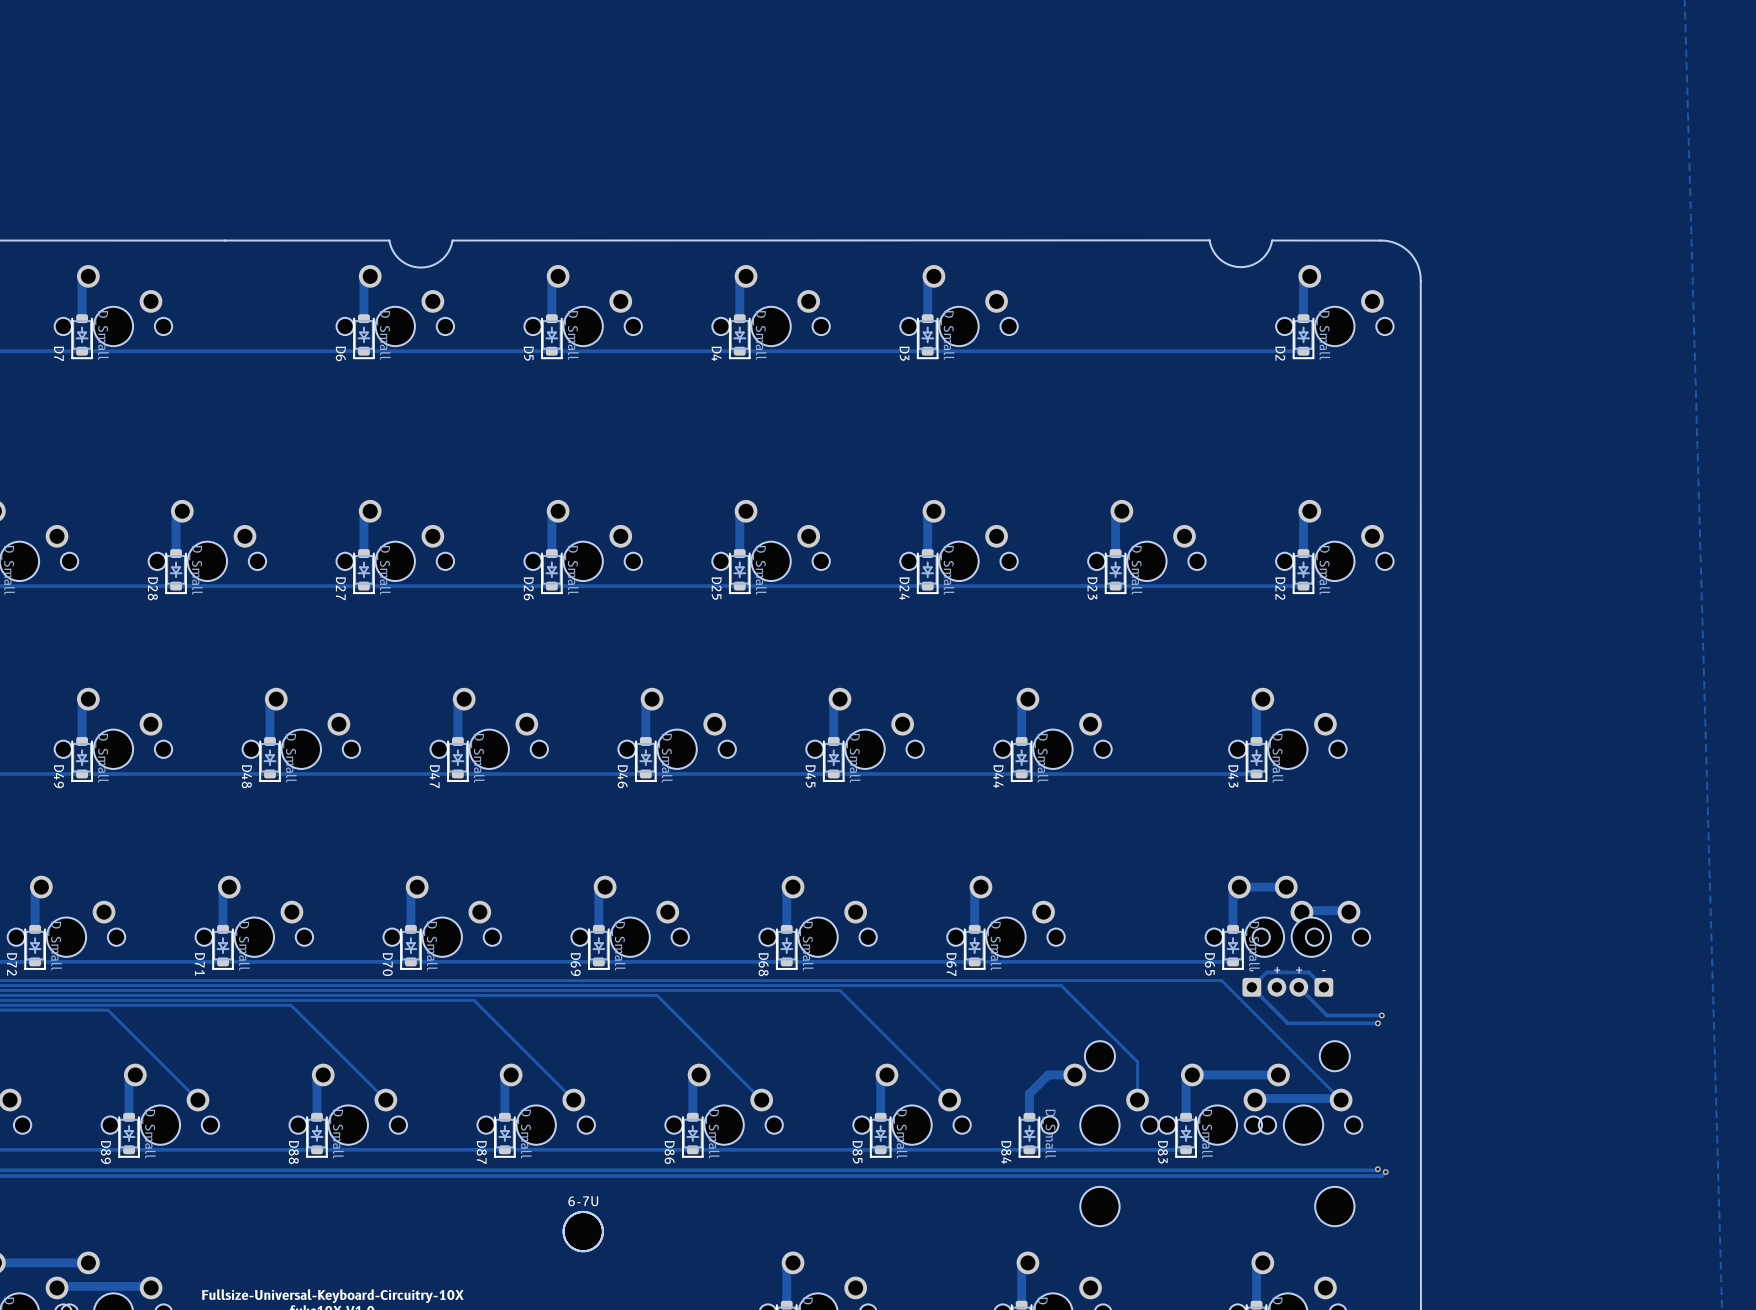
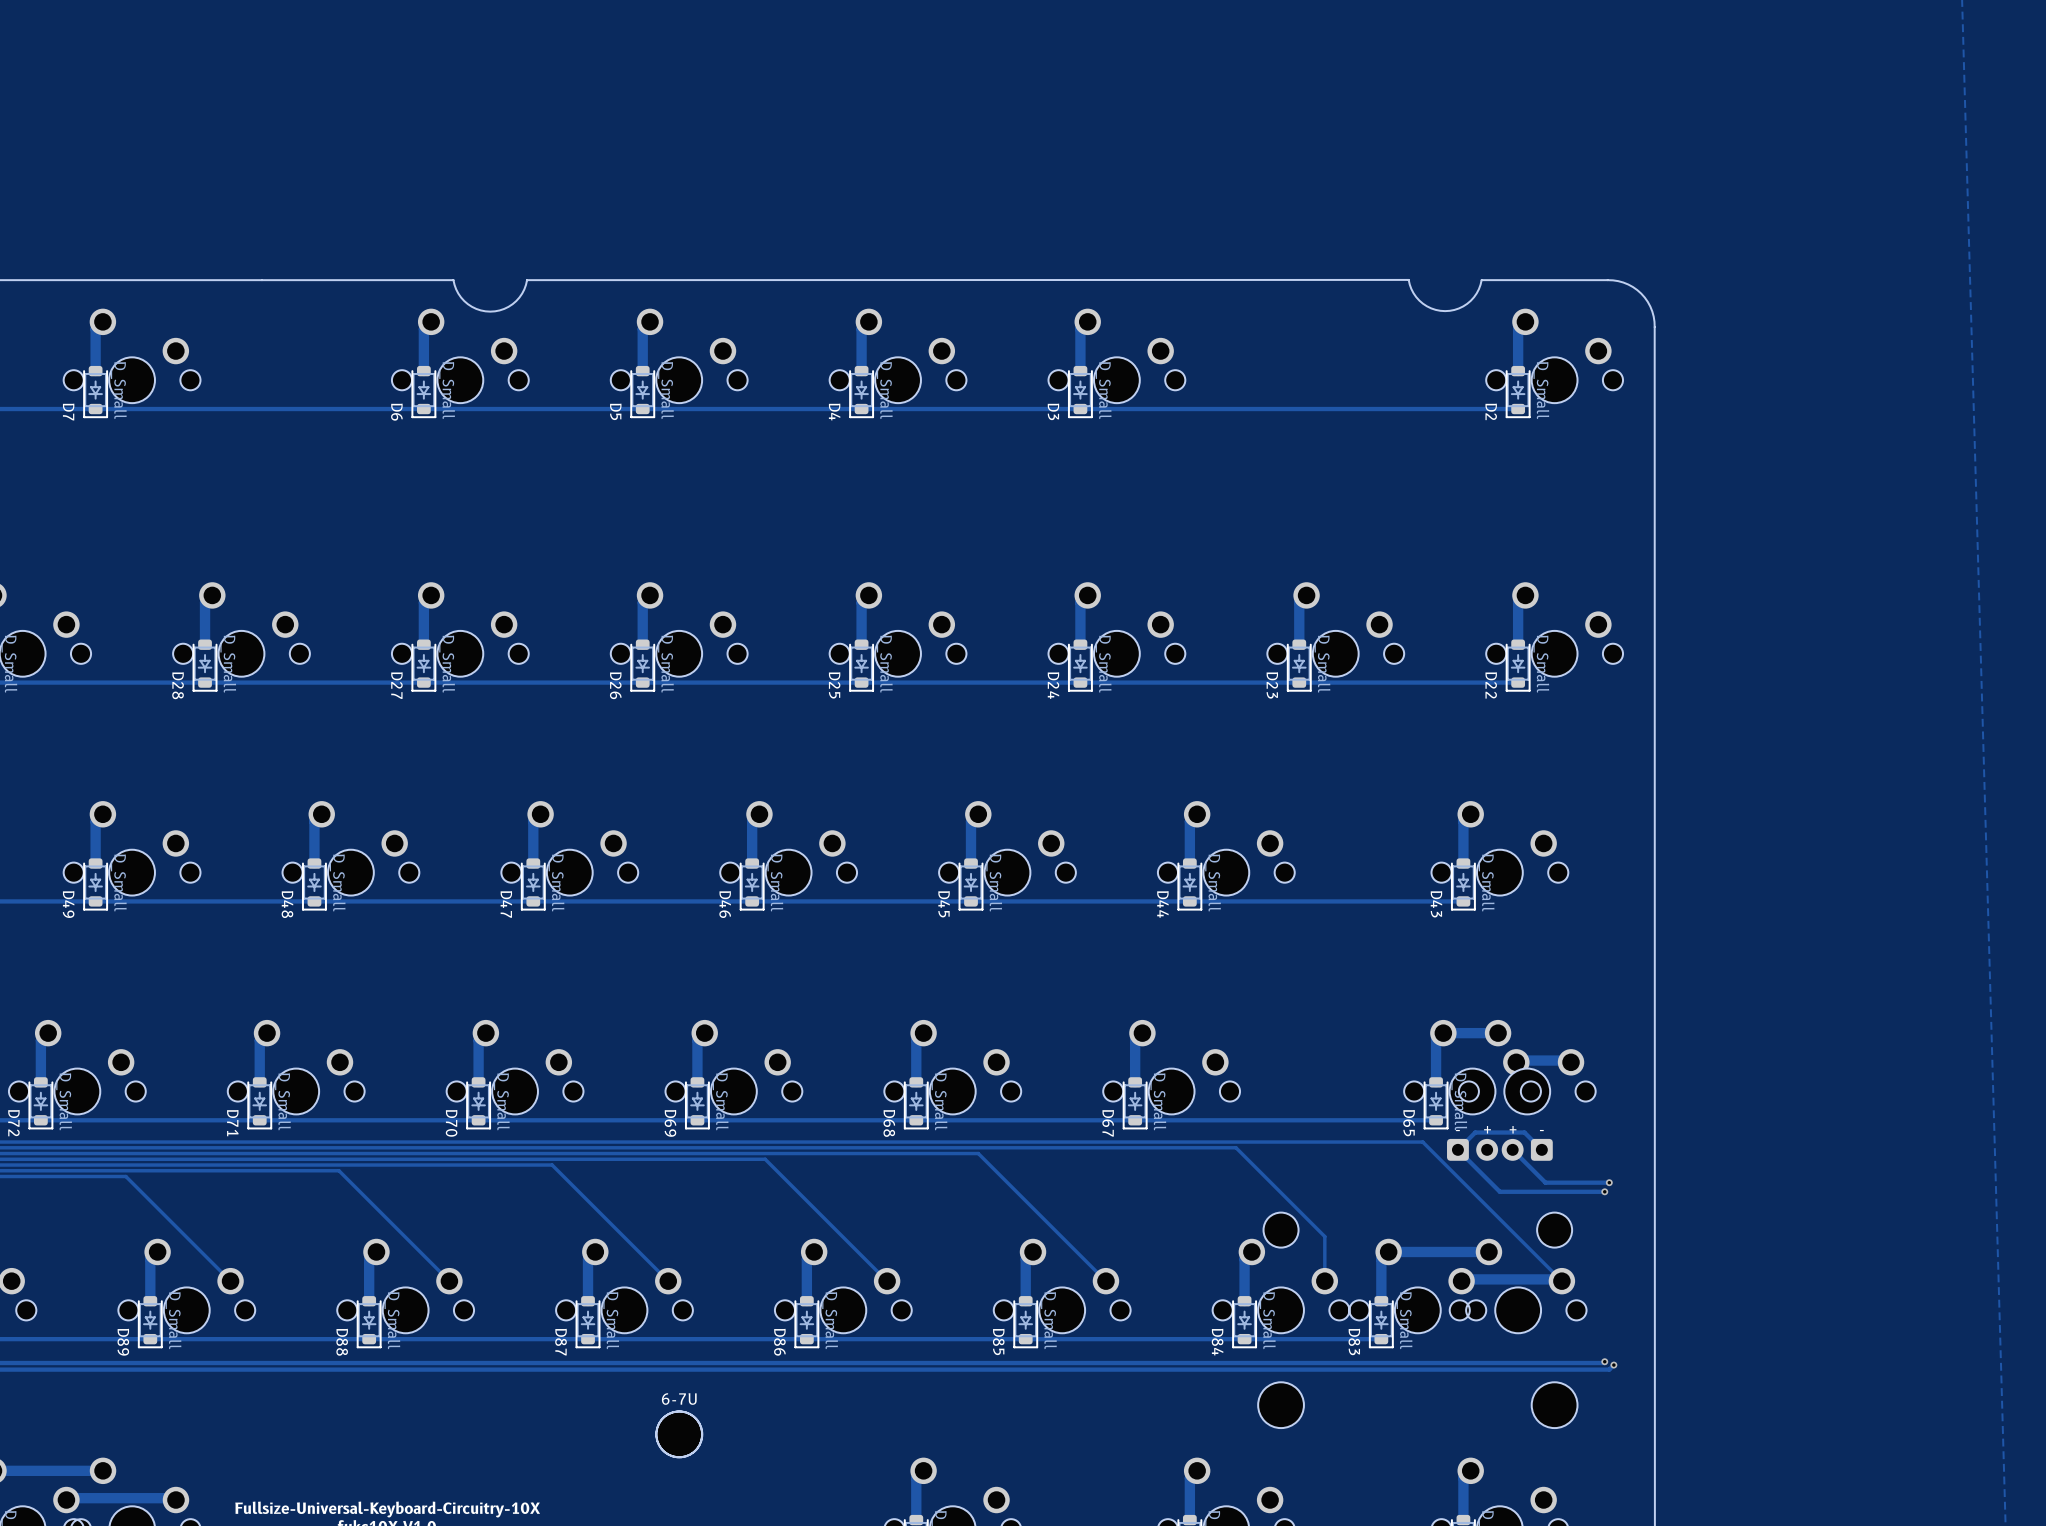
track: (1074, 1074) (1048, 1074) (1029, 1093) (1029, 1117) -> (1251, 1251) (1244, 1259) (1244, 1301)
D84 position: (1029, 1135) -> (1244, 1322)

